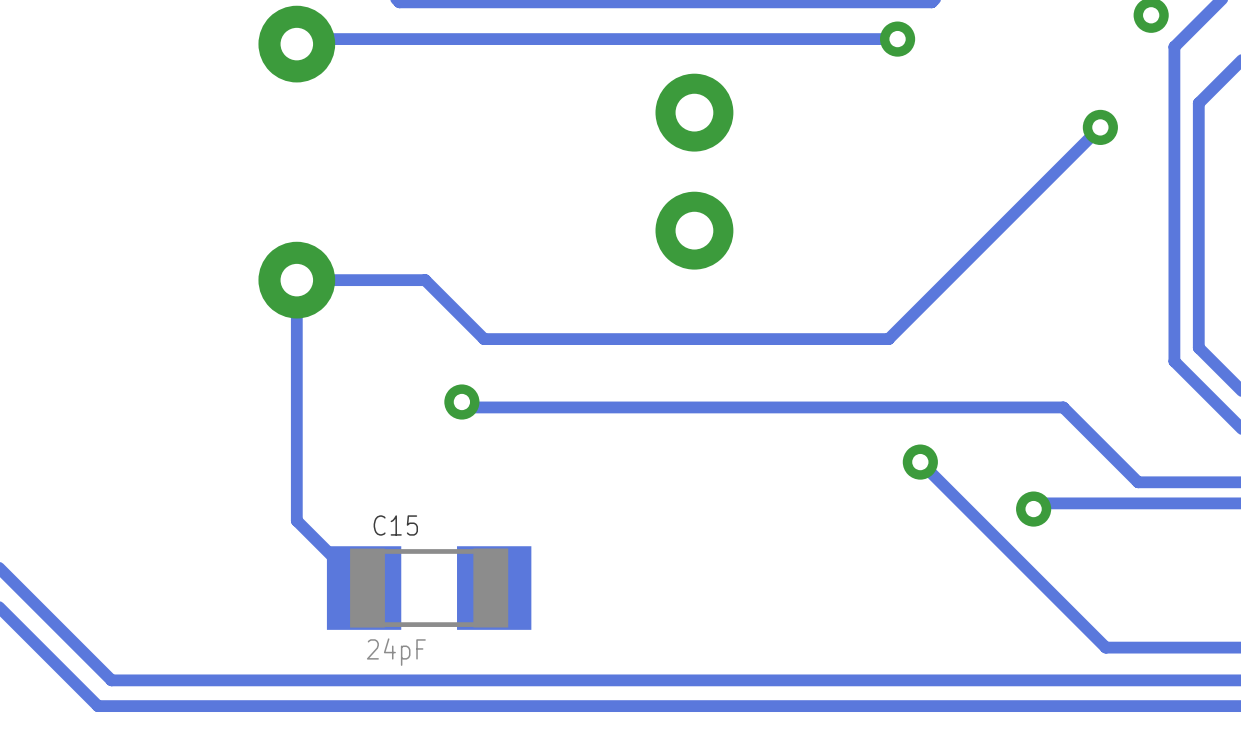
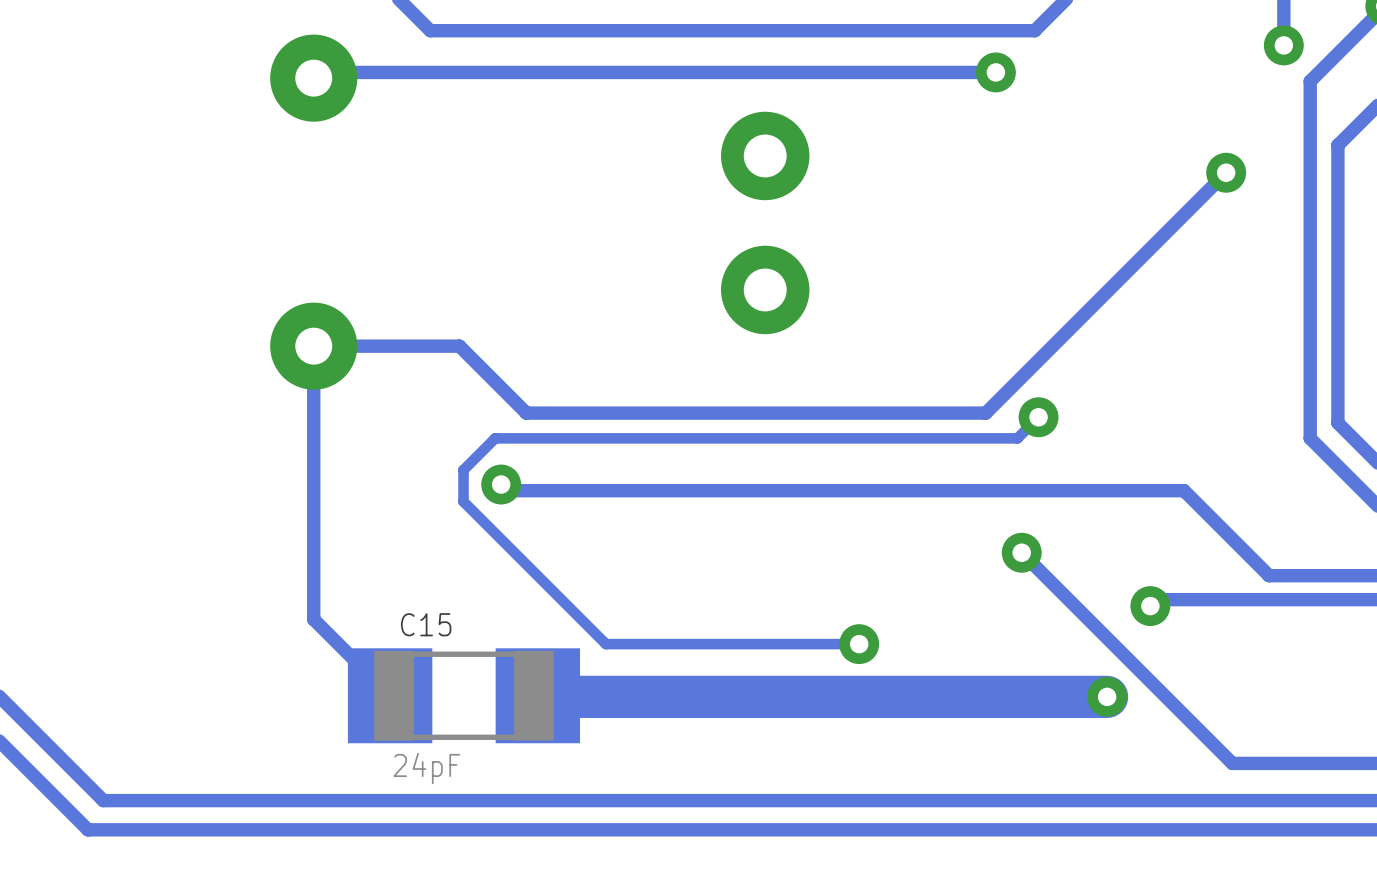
track: none -> (1038, 417) (1017, 438) (495, 438) (463, 470) (463, 501) (605, 644) (859, 644)
via: none -> (1038, 417)
via: none -> (859, 644)
track: none -> (537, 695) (1107, 696)
via: none -> (1107, 696)

